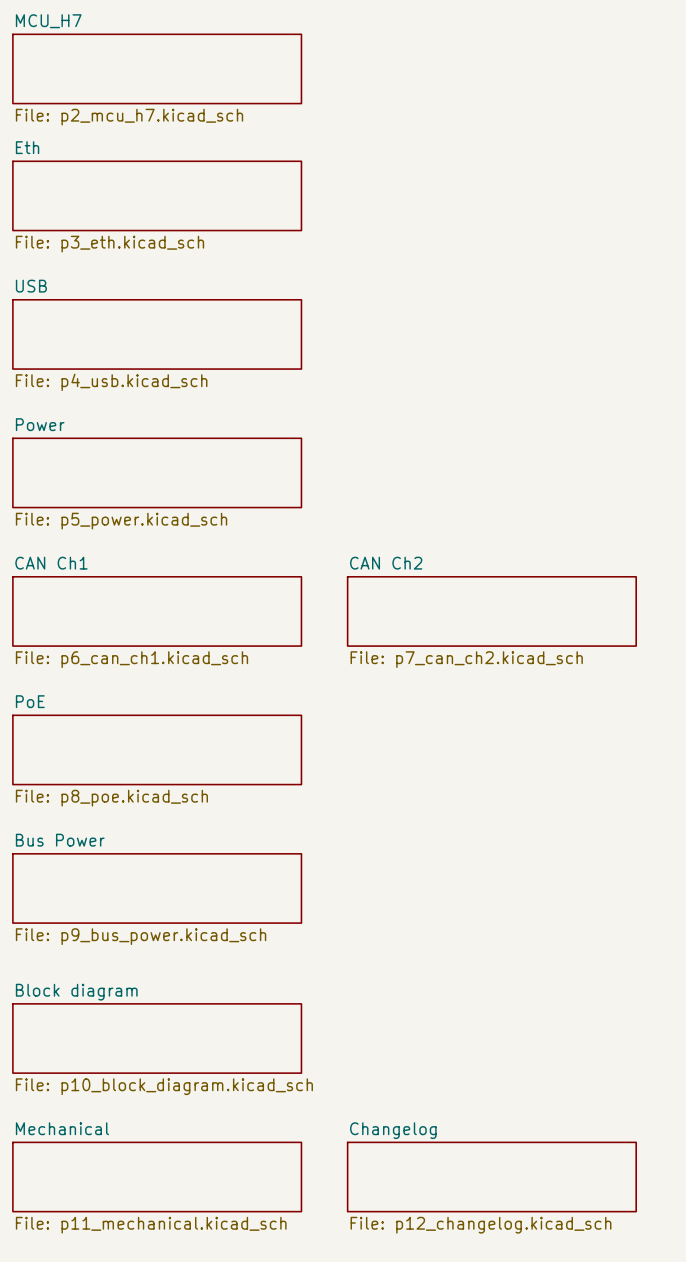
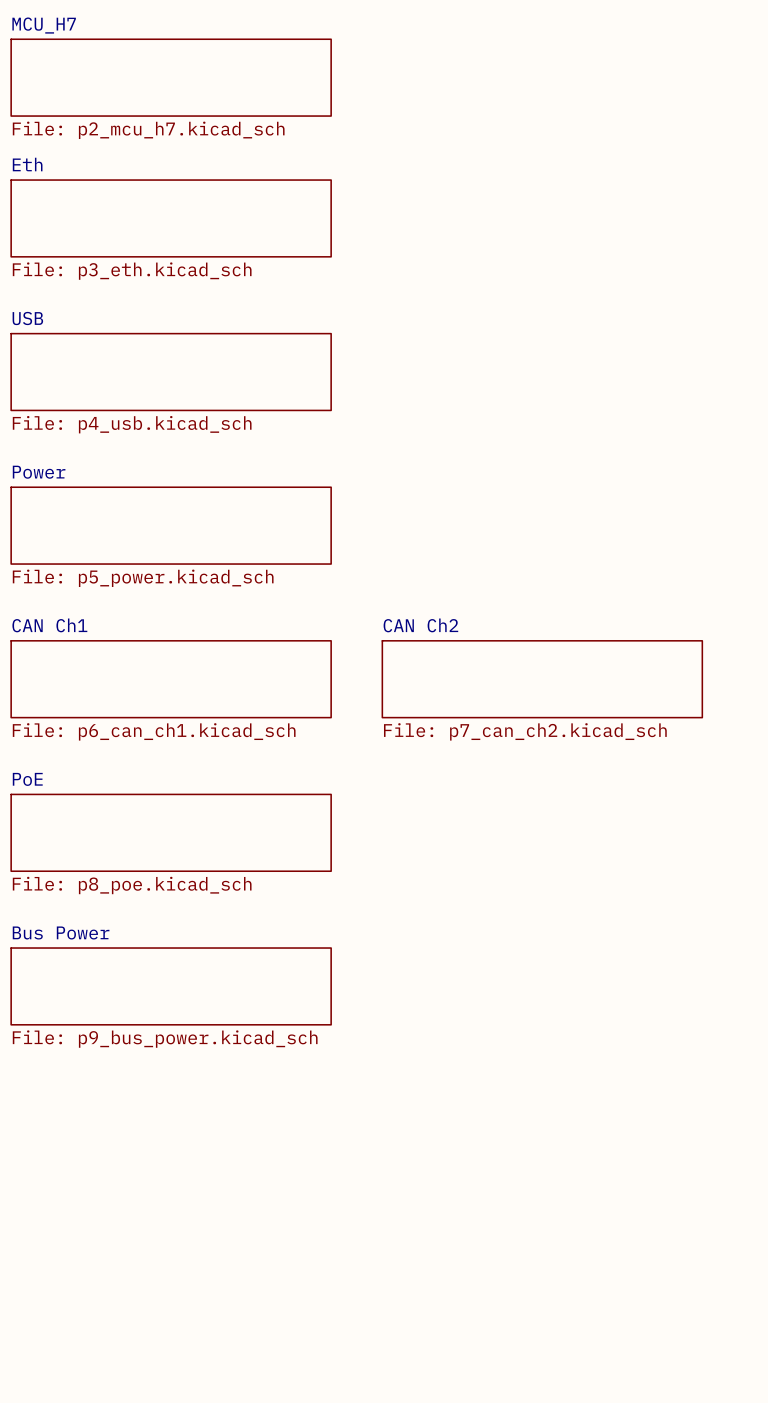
sheet Block diagram: File: p10_block_diagram.kicad_sch (157, 1038) -> none
sheet Mechanical: File: p11_mechanical.kicad_sch (157, 1177) -> none
sheet Changelog: File: p12_changelog.kicad_sch (491, 1177) -> none

